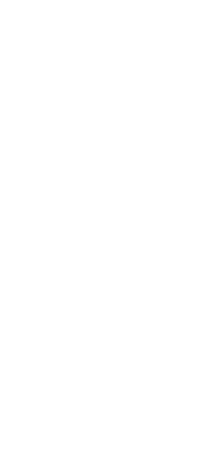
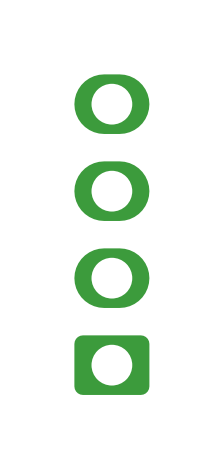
part: none -> (111, 234)

